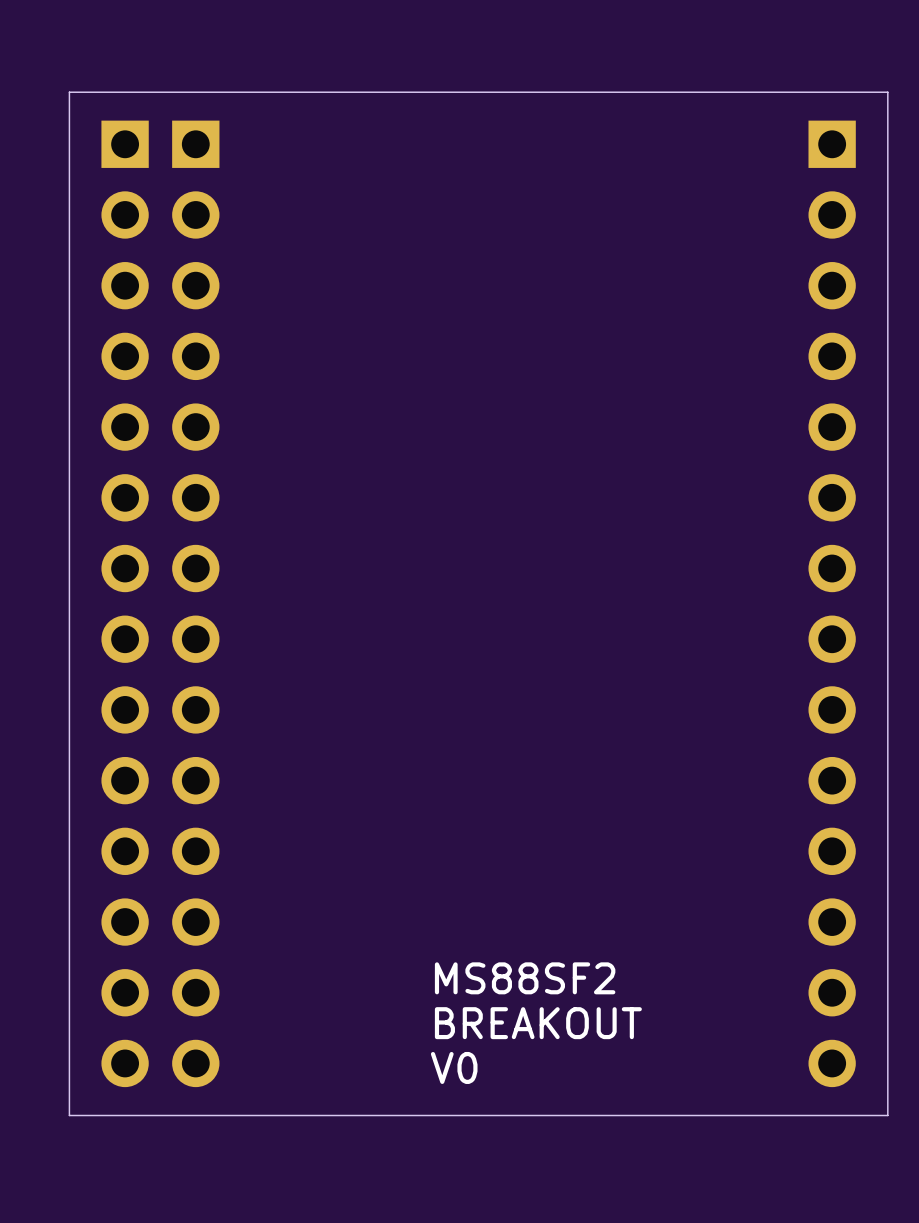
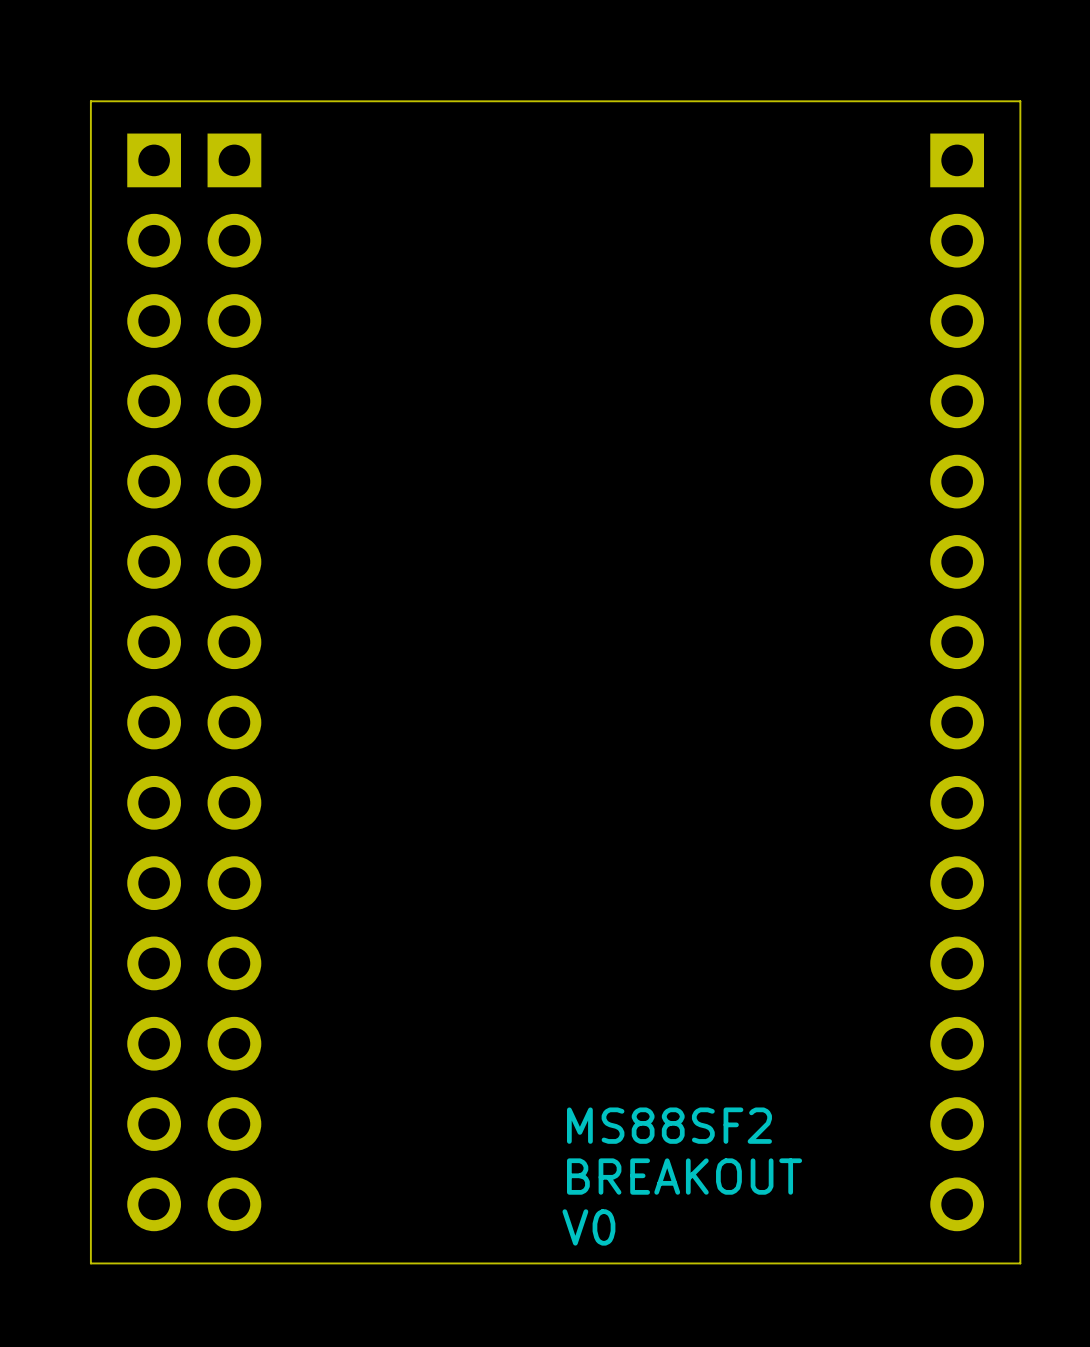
text position: MS88SF2 (525, 978) -> MS88SF2 (669, 1125)
text position: BREAKOUT (538, 1023) -> BREAKOUT (684, 1176)
text position: V0 (454, 1067) -> V0 (588, 1227)

